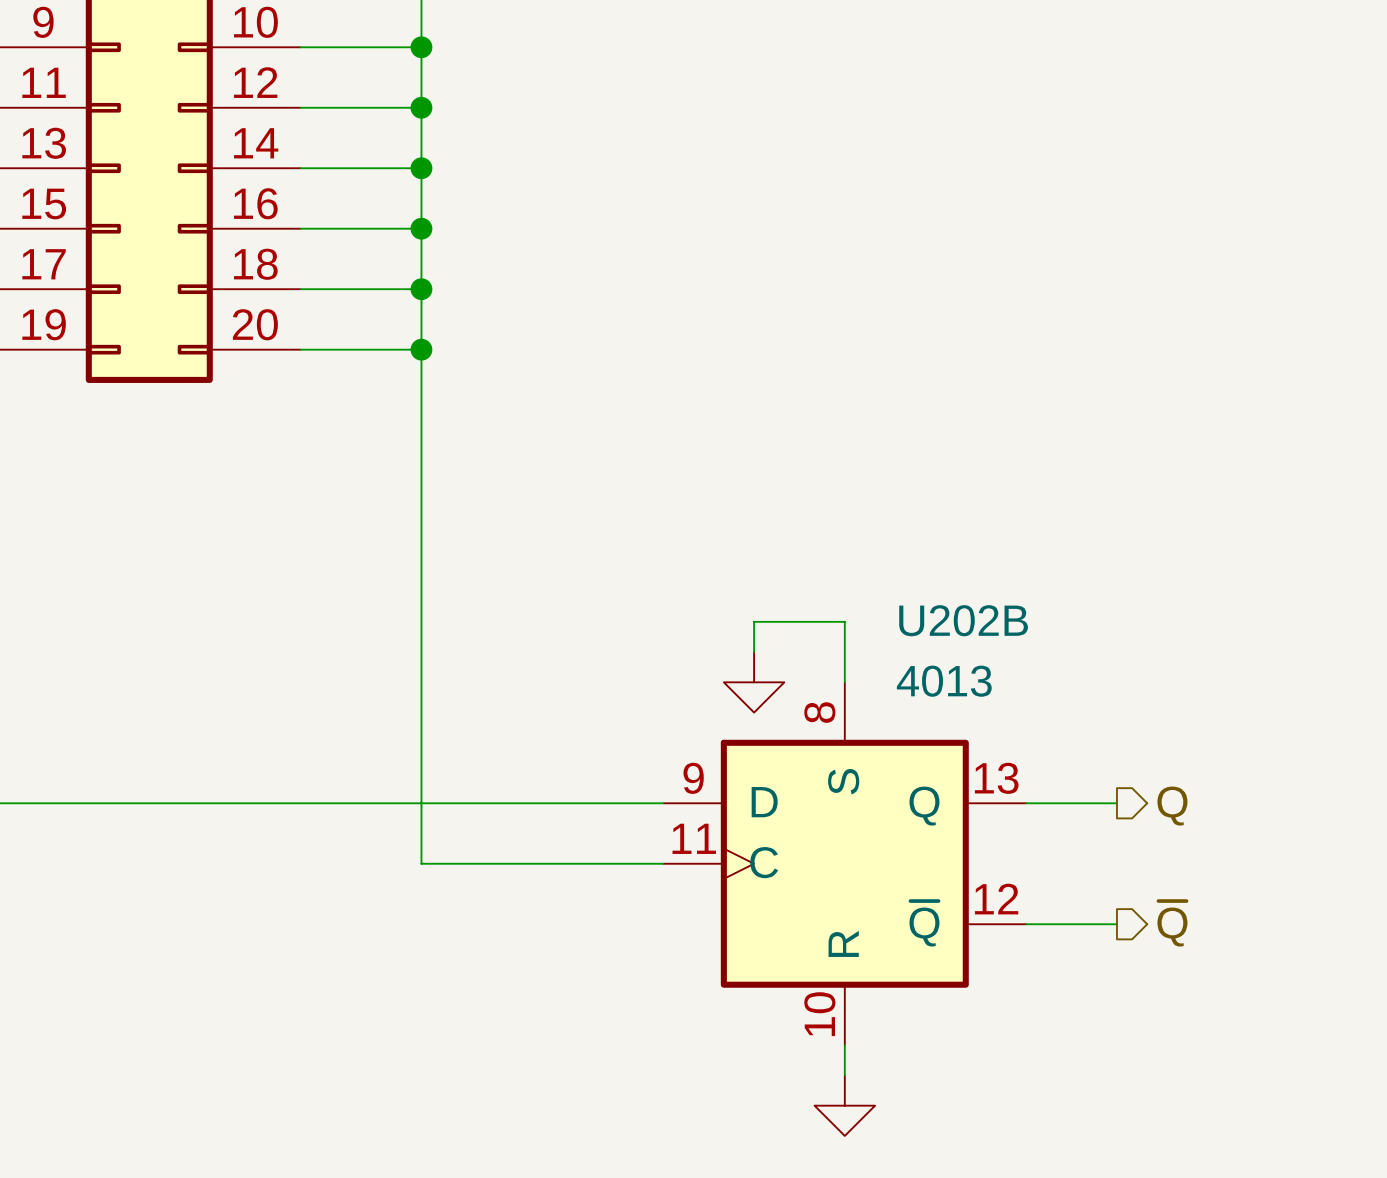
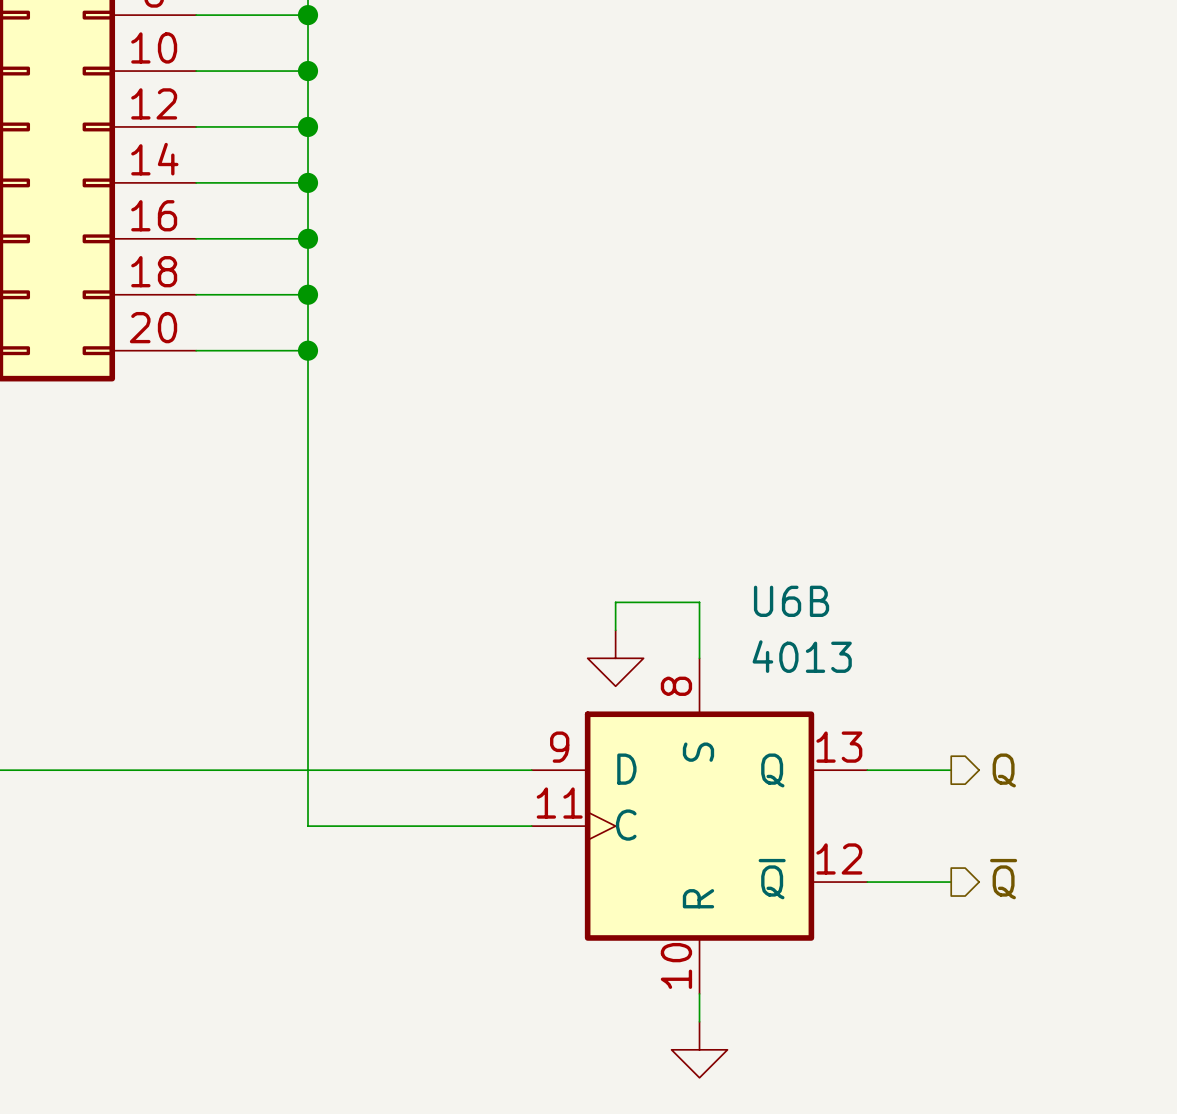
U202B name: U202B (963, 620) -> U6B (791, 601)

